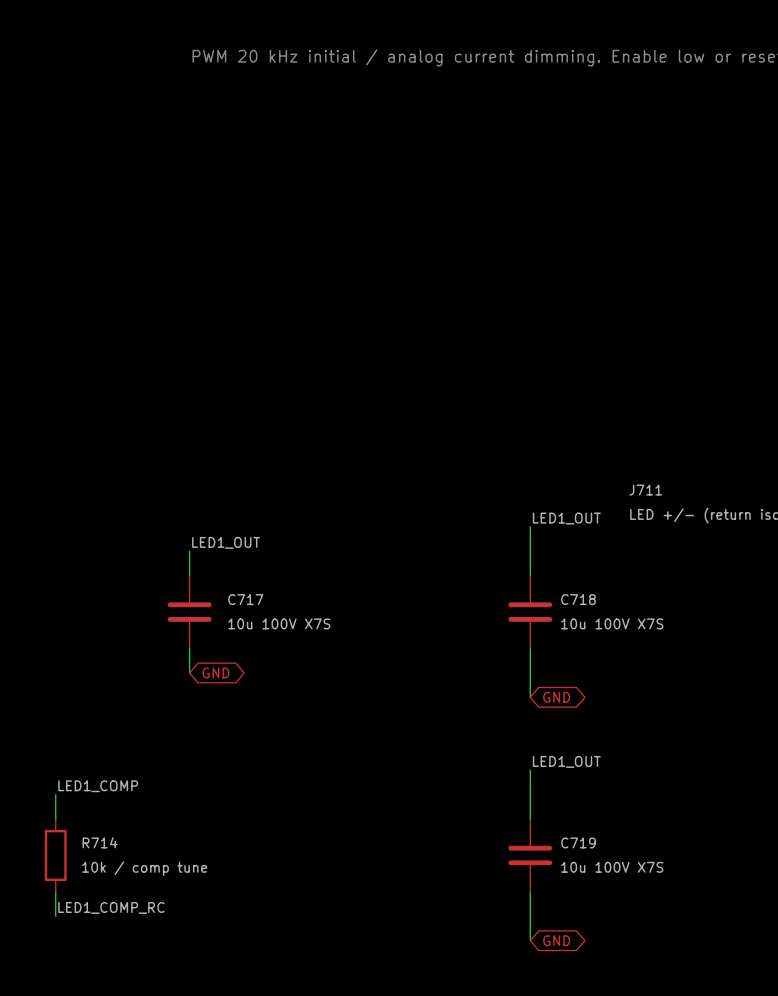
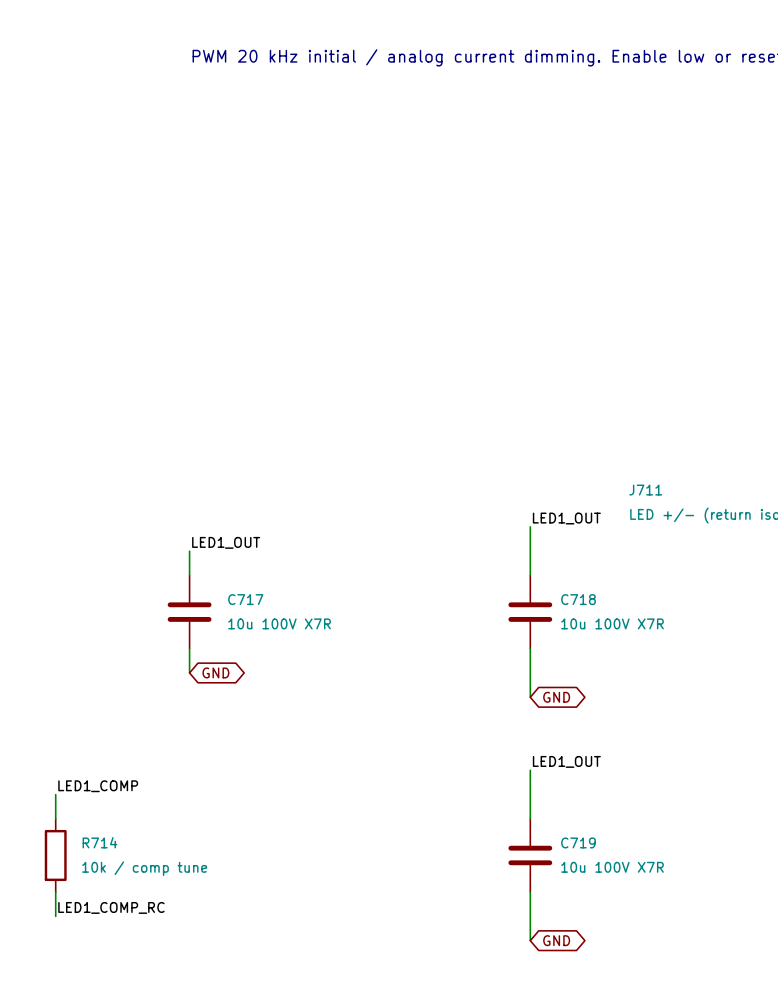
C717 value: 10u 100V X7S (279, 623) -> 10u 100V X7R (279, 623)
C718 value: 10u 100V X7S (612, 623) -> 10u 100V X7R (612, 623)
C719 value: 10u 100V X7S (612, 867) -> 10u 100V X7R (612, 867)

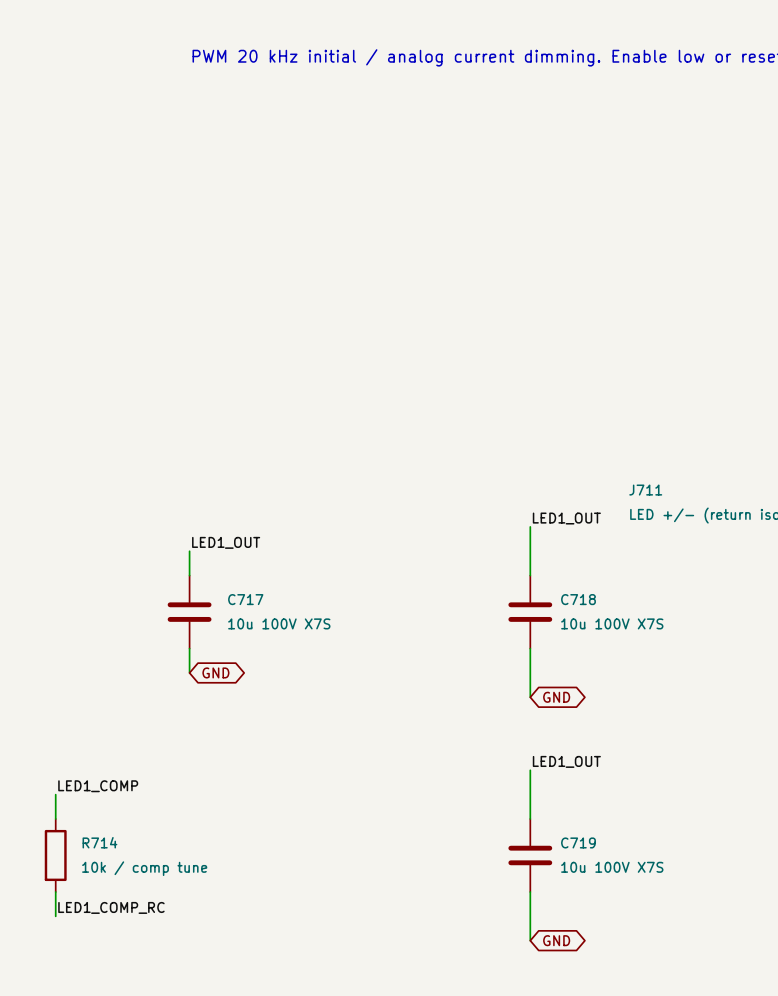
C717 value: 10u 100V X7R (279, 623) -> 10u 100V X7S (279, 623)
C718 value: 10u 100V X7R (612, 623) -> 10u 100V X7S (612, 623)
C719 value: 10u 100V X7R (612, 867) -> 10u 100V X7S (612, 867)

